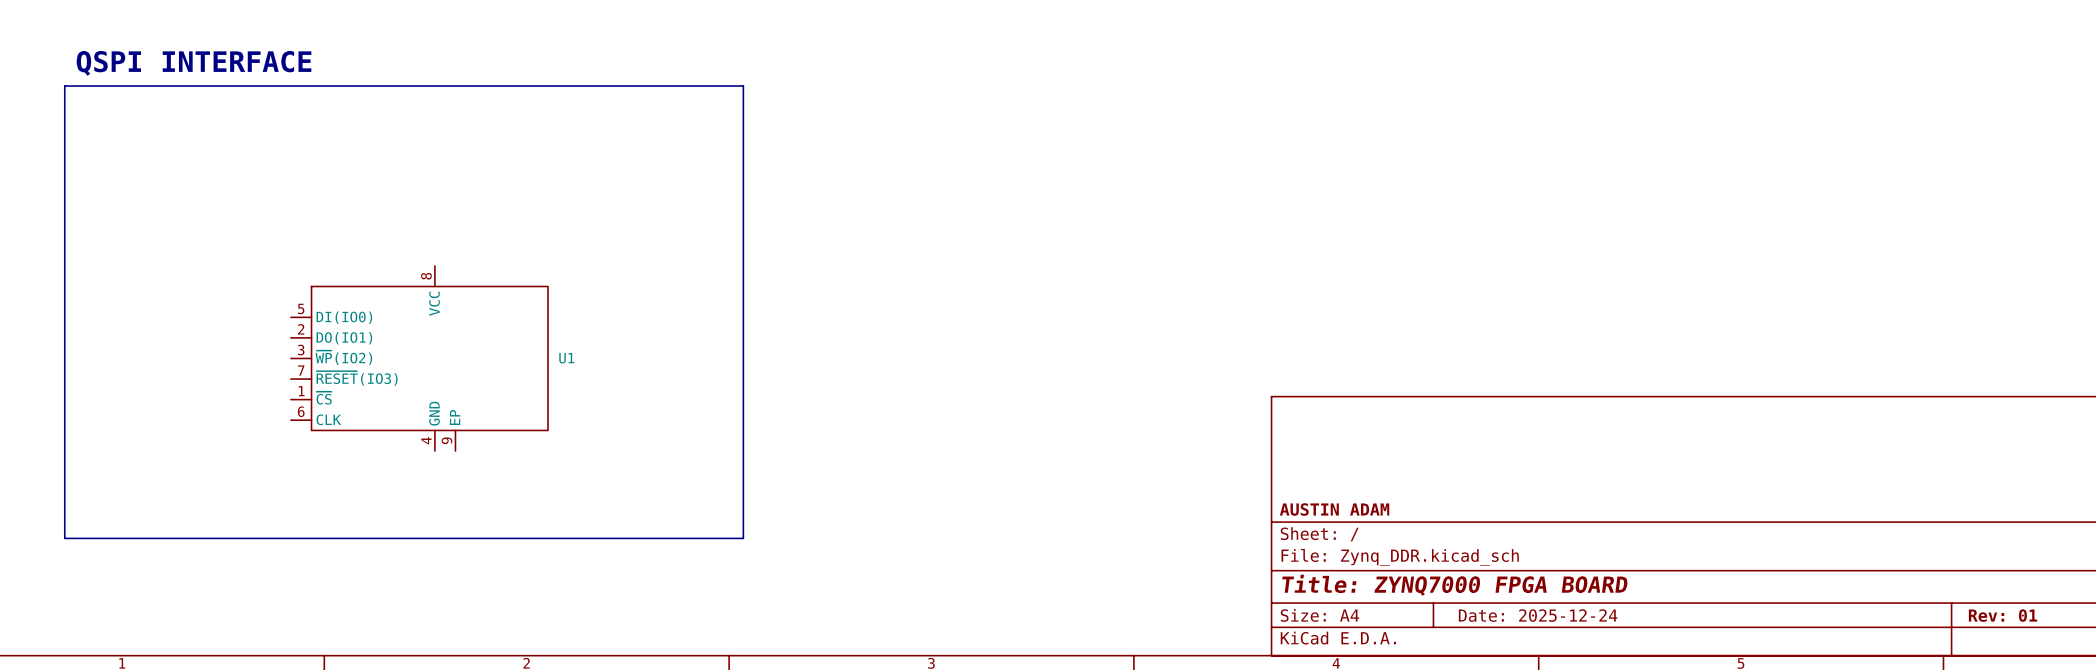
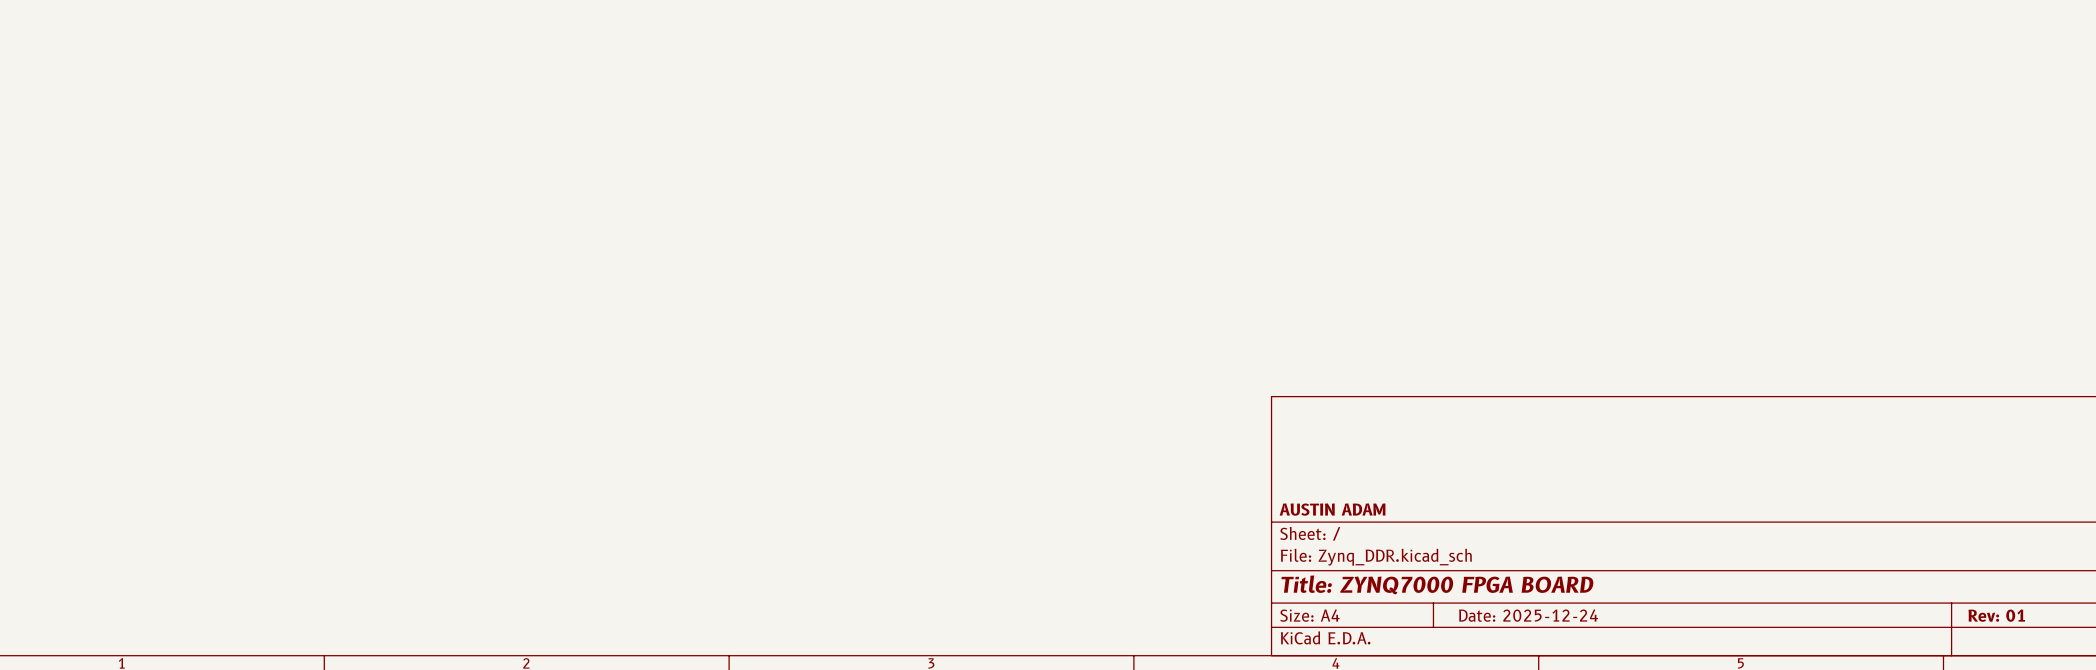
text: QSPI INTERFACE (194, 63) -> none
line: (64, 86) (743, 86) (743, 538) (64, 538) (64, 86) -> none
U1: (419, 358) -> none

